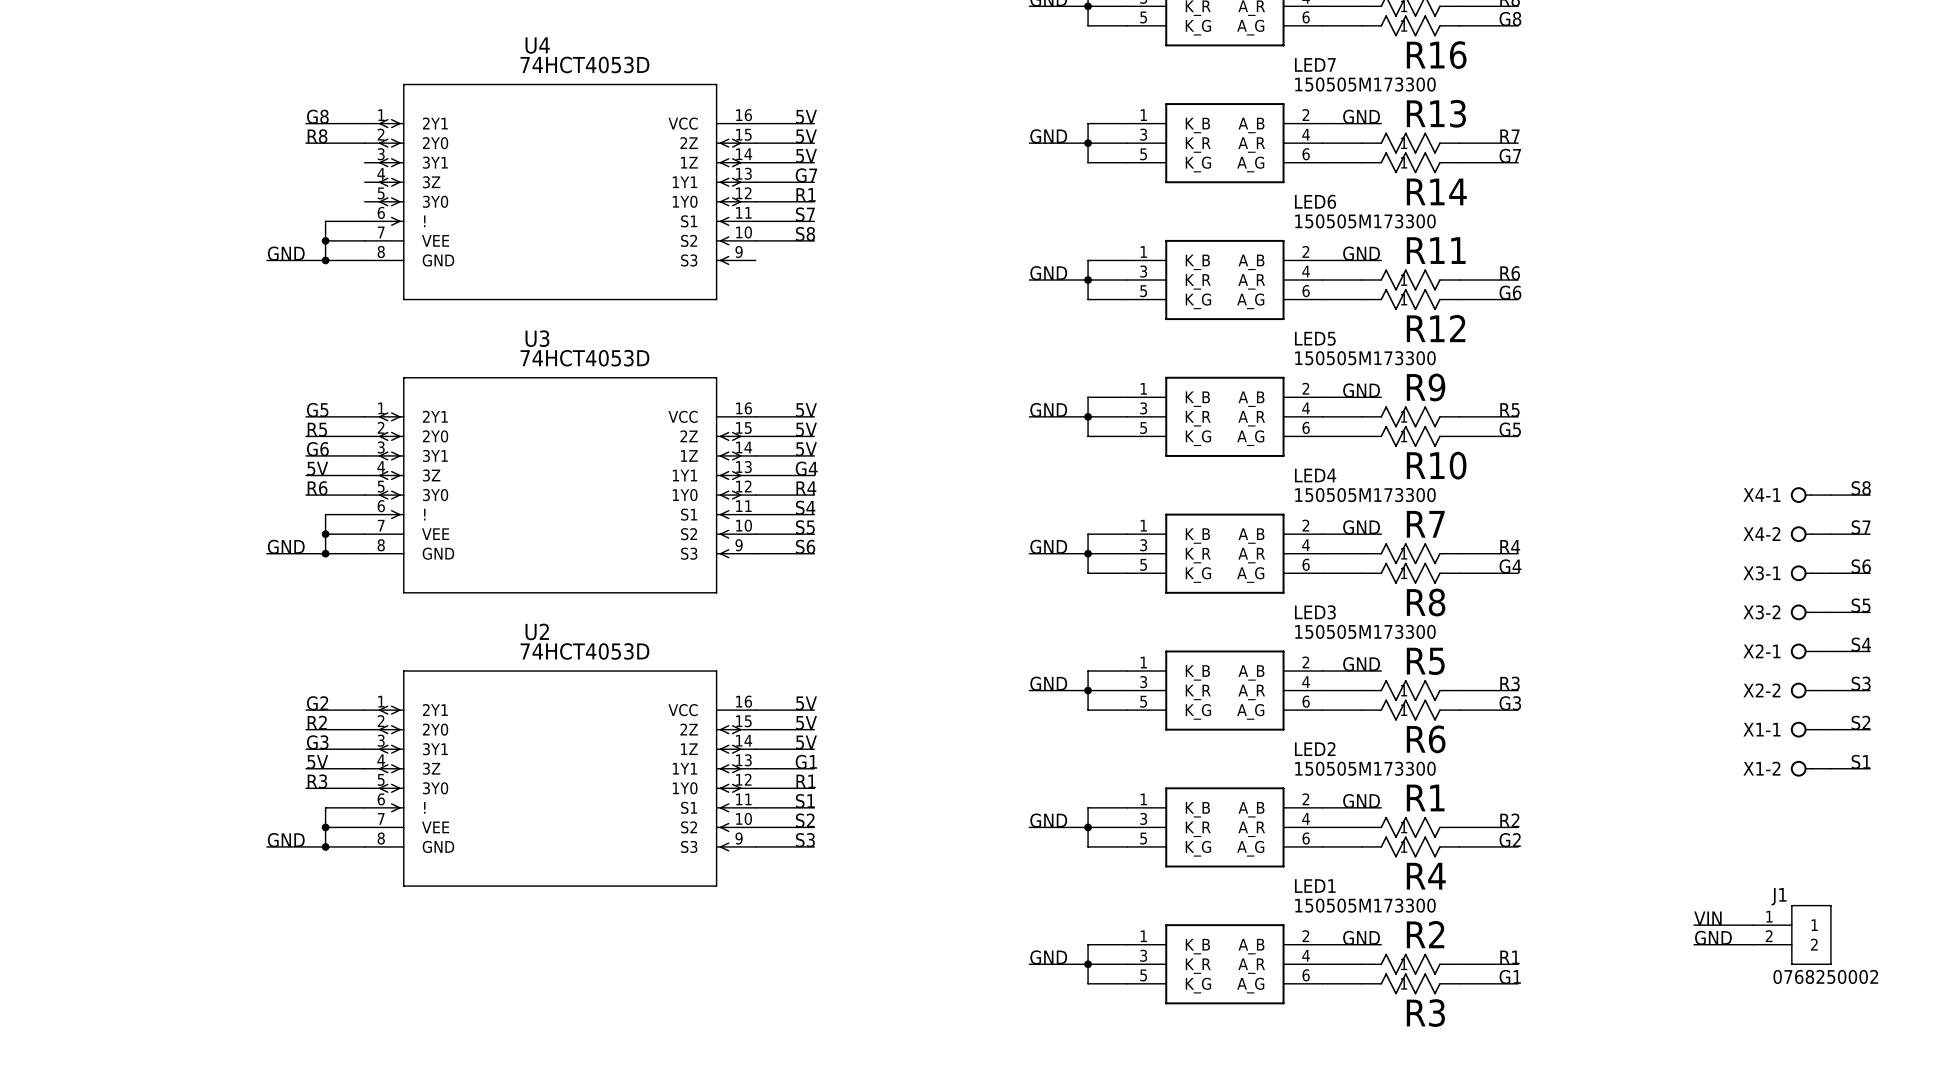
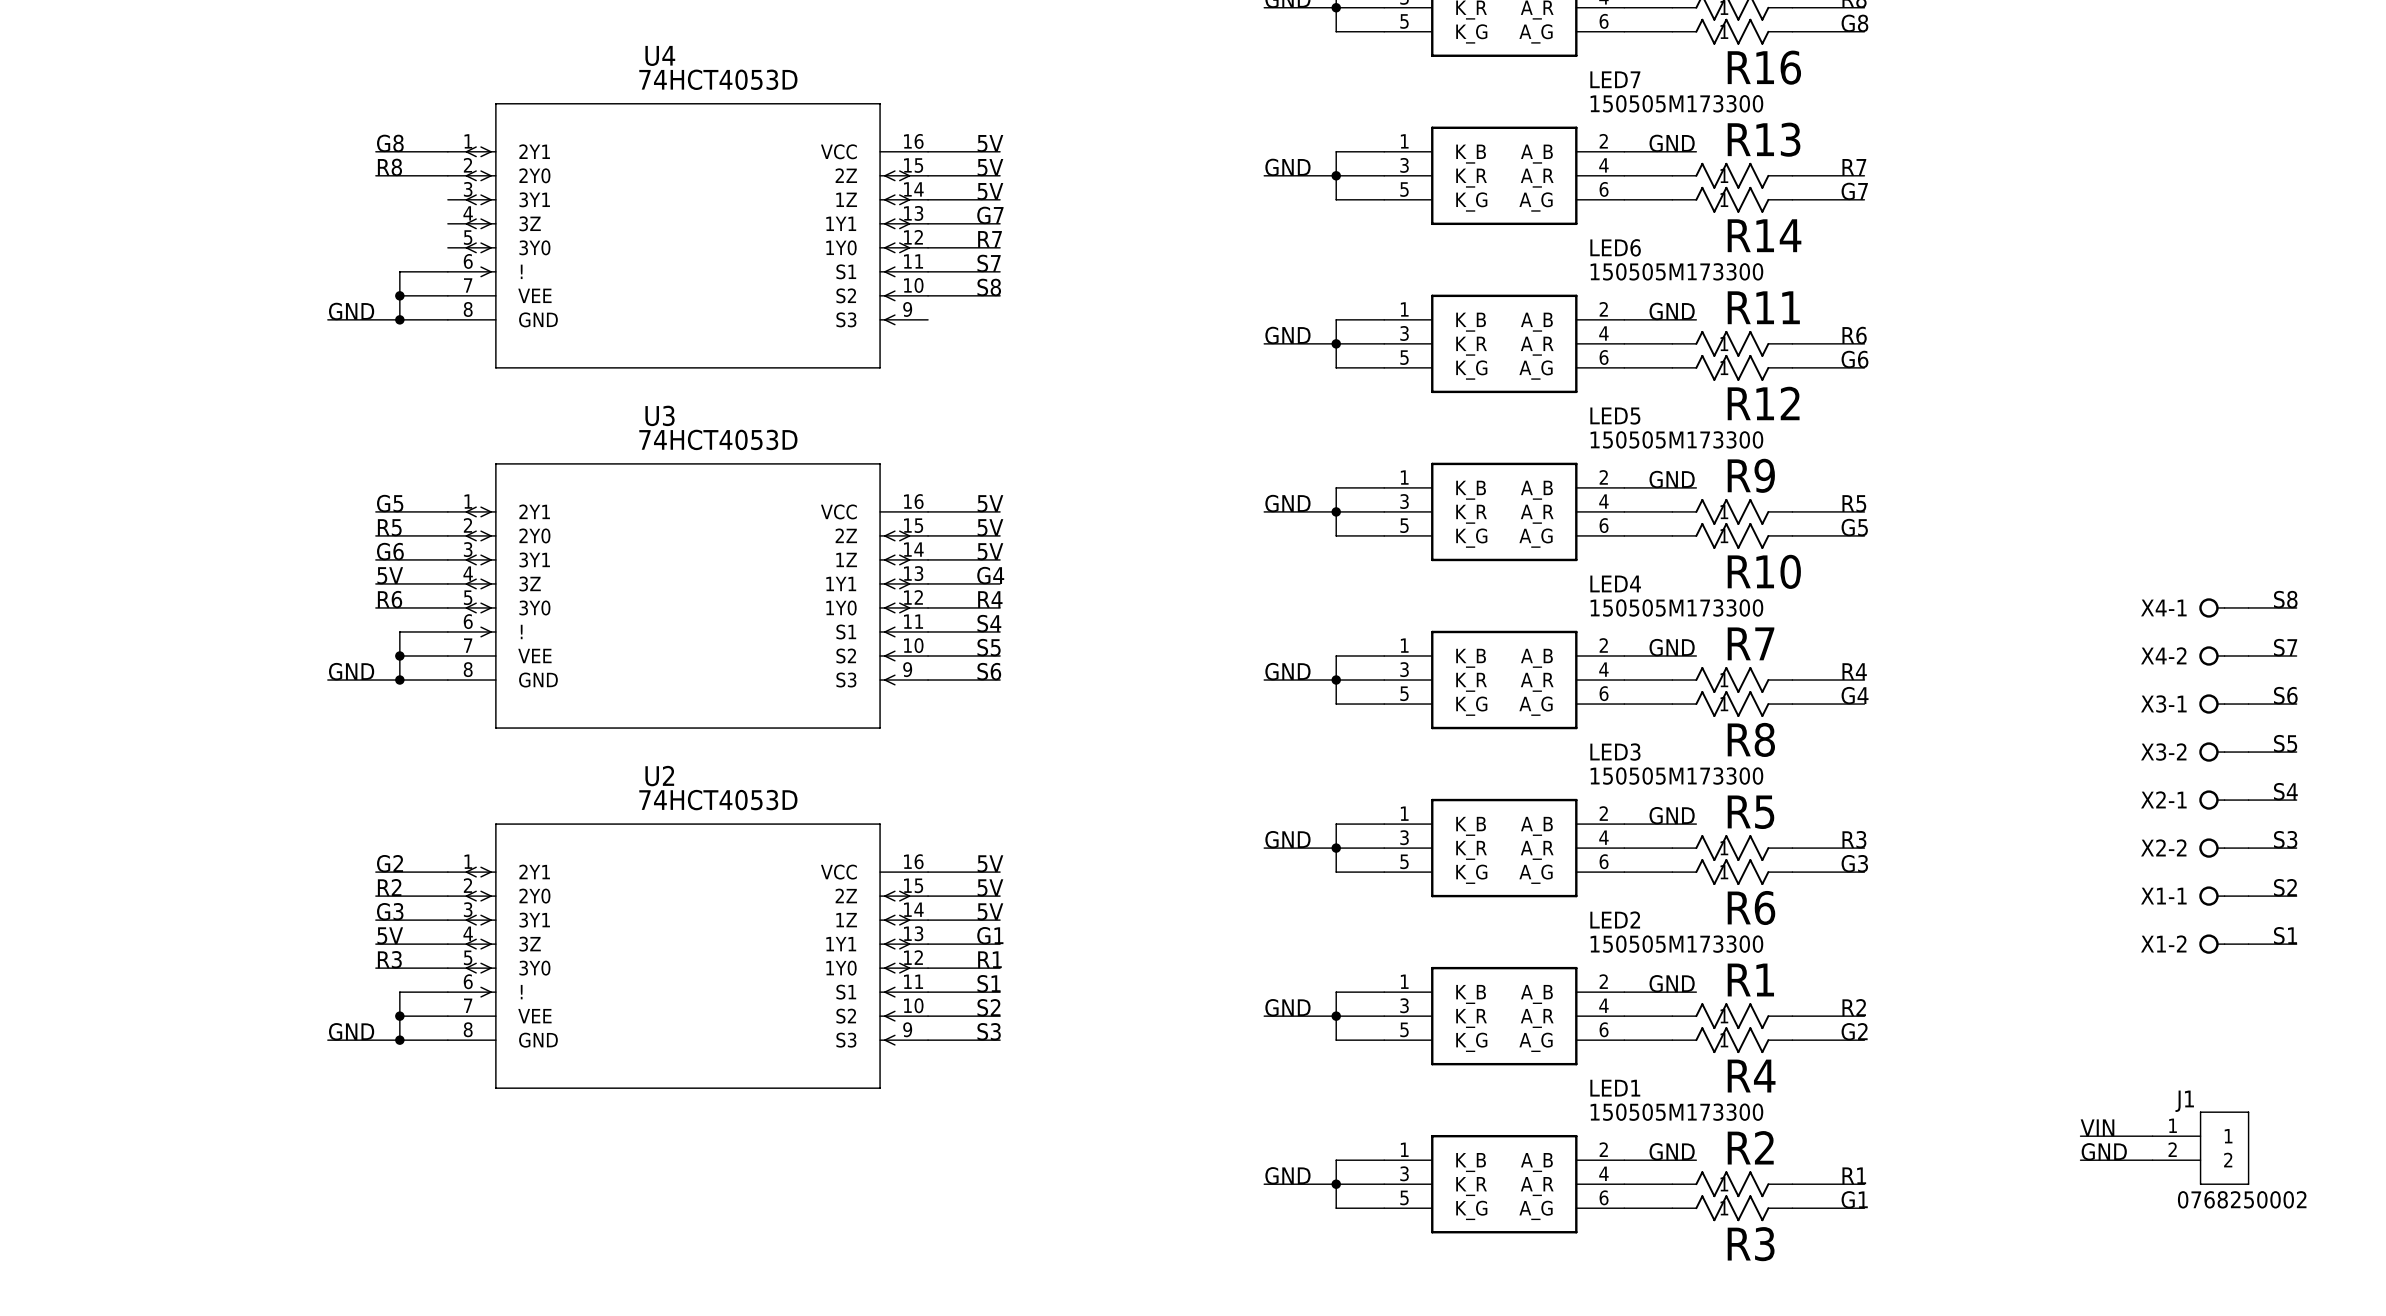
label: R1 (806, 194) -> R7 (990, 239)

